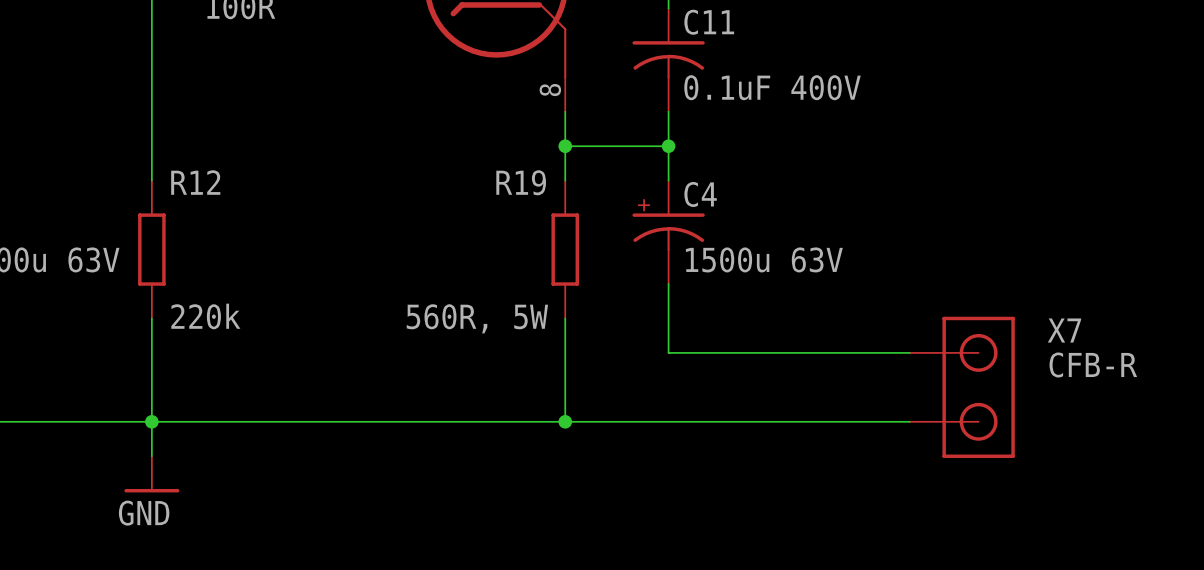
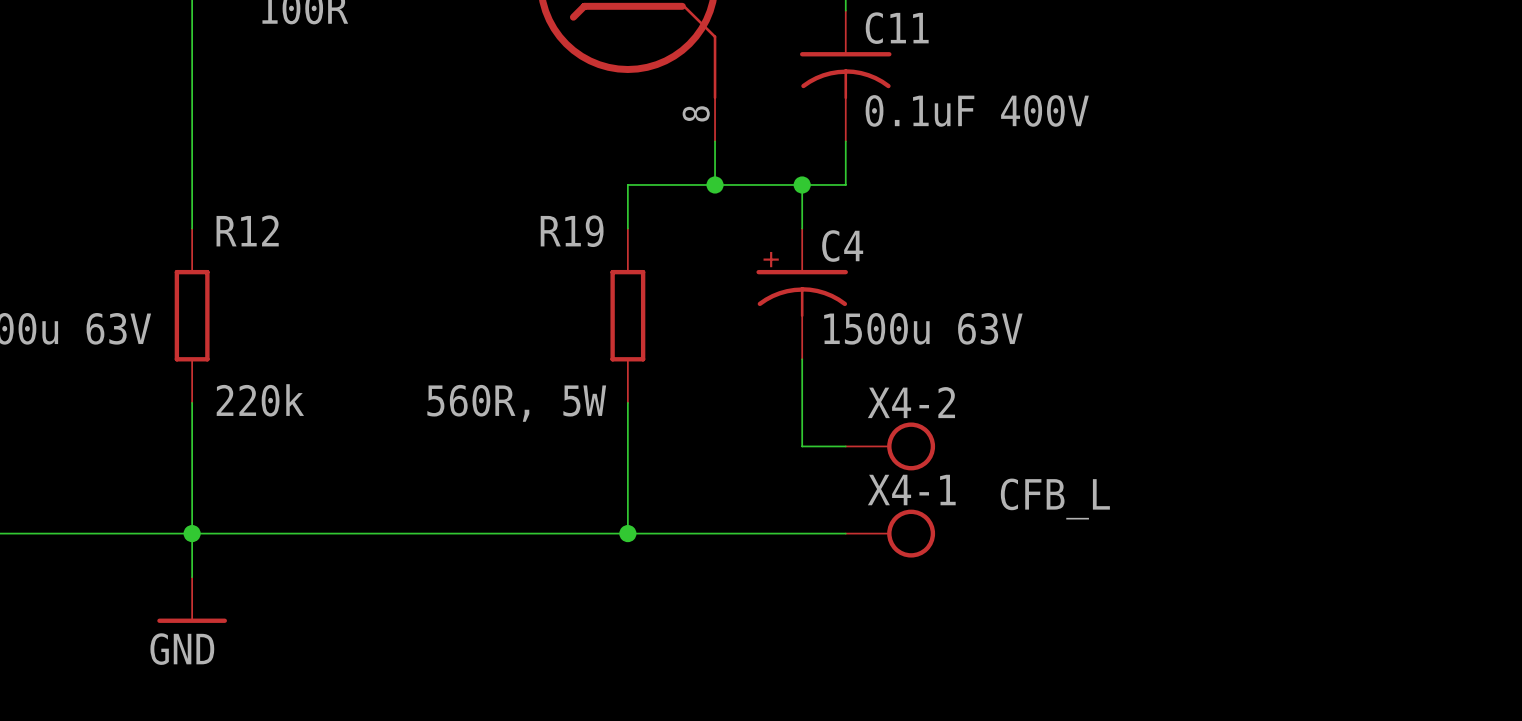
wire: (565, 146) (565, 180) -> (715, 184) (627, 184) (627, 228)
wire: (668, 146) (668, 180) -> (802, 184) (802, 228)
junction position: (668, 146) -> (802, 184)
C4 position: (668, 232) -> (802, 293)
R19 position: (565, 249) -> (627, 315)
wire: none -> (802, 359) (802, 446) (845, 446)
wire: (668, 284) (668, 352) (909, 352) -> none
wire: (565, 318) (565, 421) -> (627, 402) (627, 533)
X4-1: none -> (890, 446)
X7: CFB-R (962, 387) -> none
junction position: (565, 421) -> (627, 533)
wire: (668, 421) (909, 421) -> none
X4-2: none -> CFB_L (890, 533)

